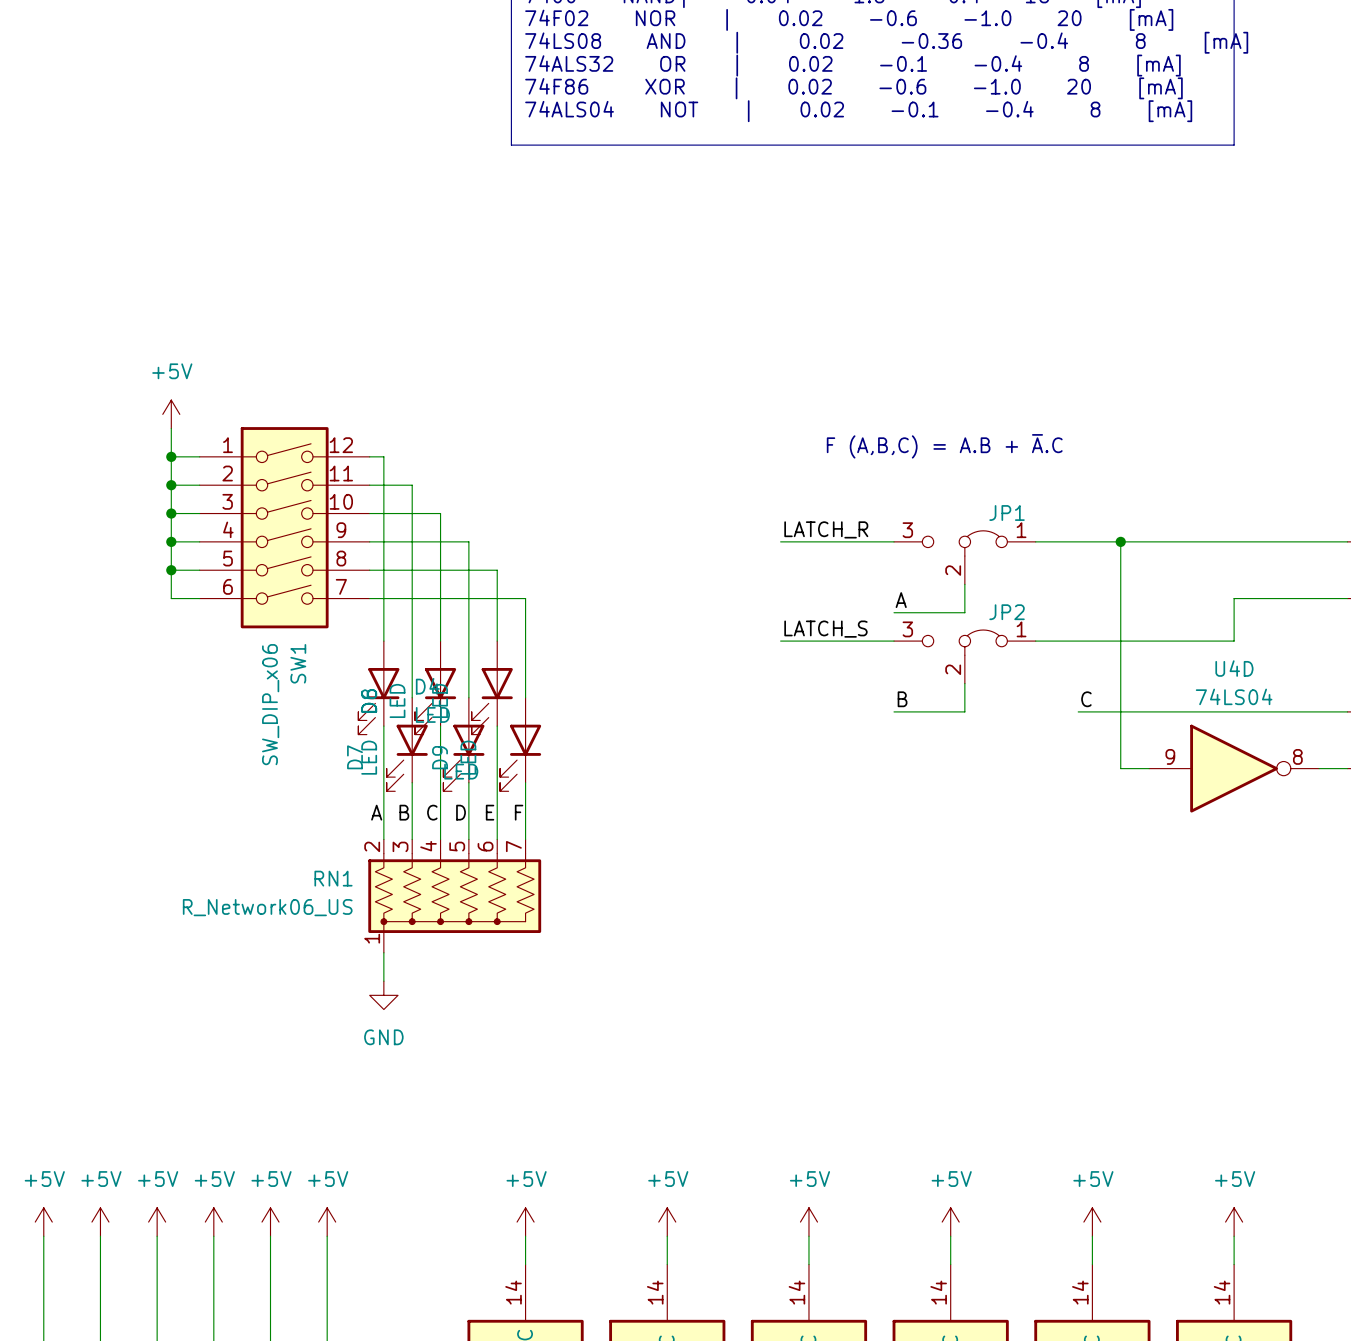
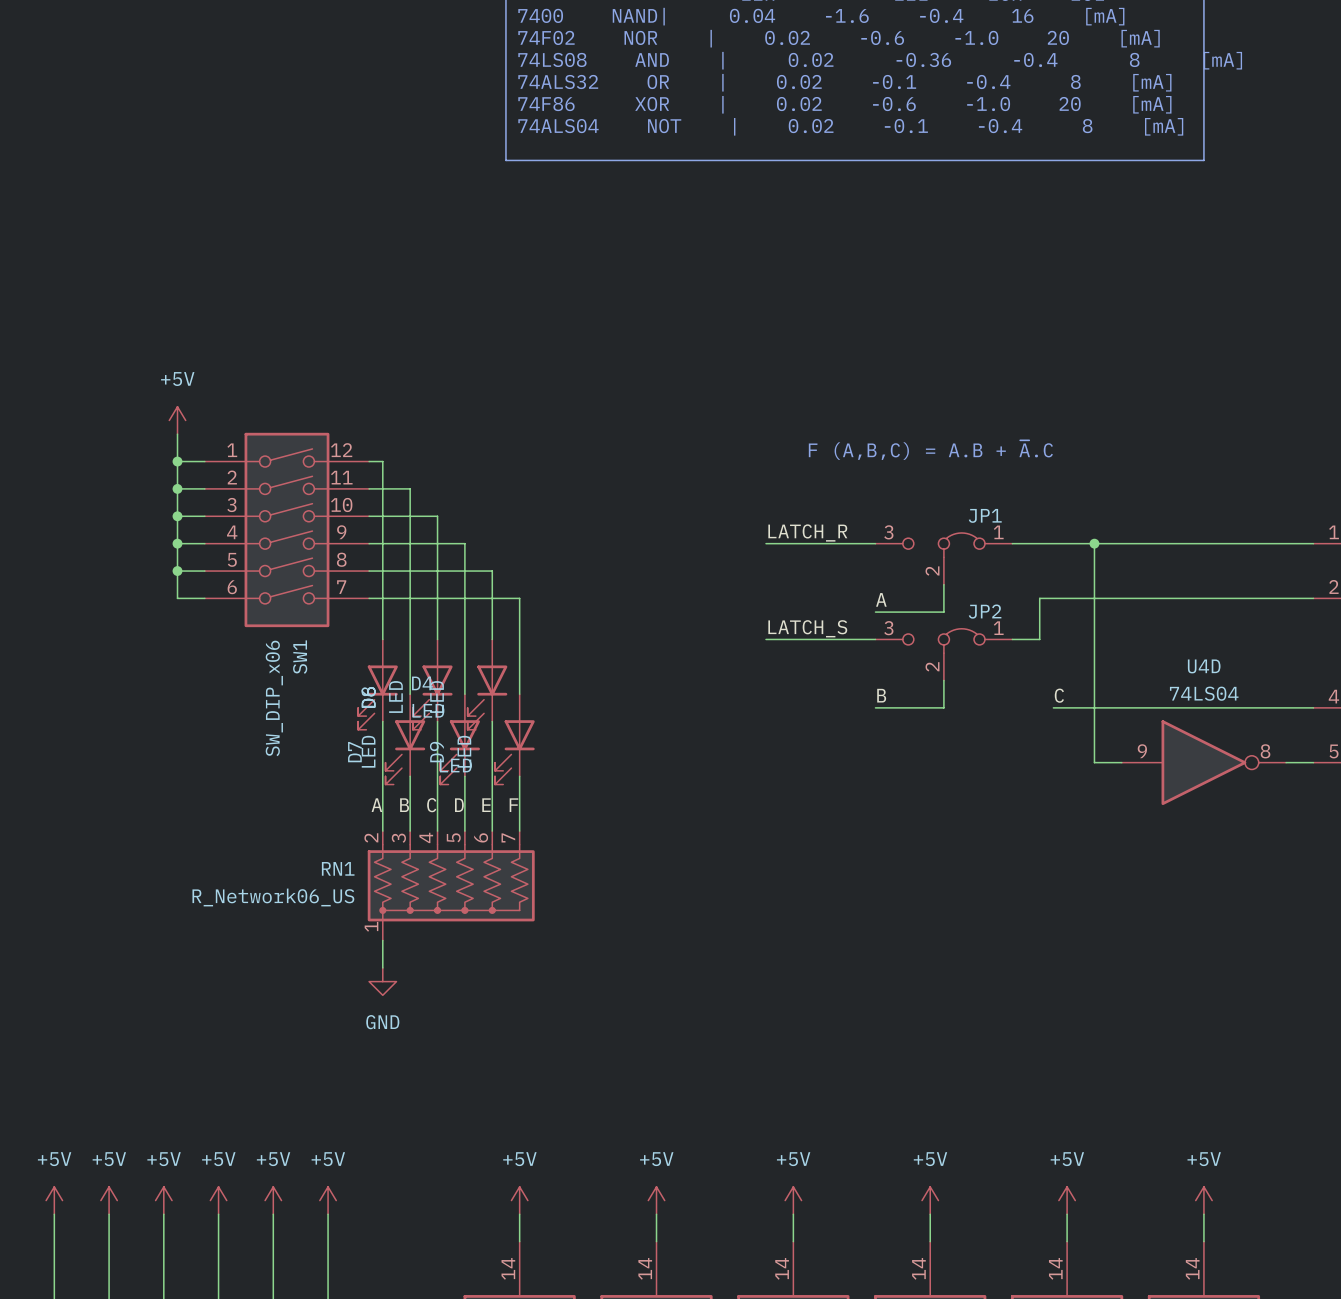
wire: (1234, 598) (1234, 641) (1064, 641) -> (1203, 598) (1039, 598) (1039, 639)

